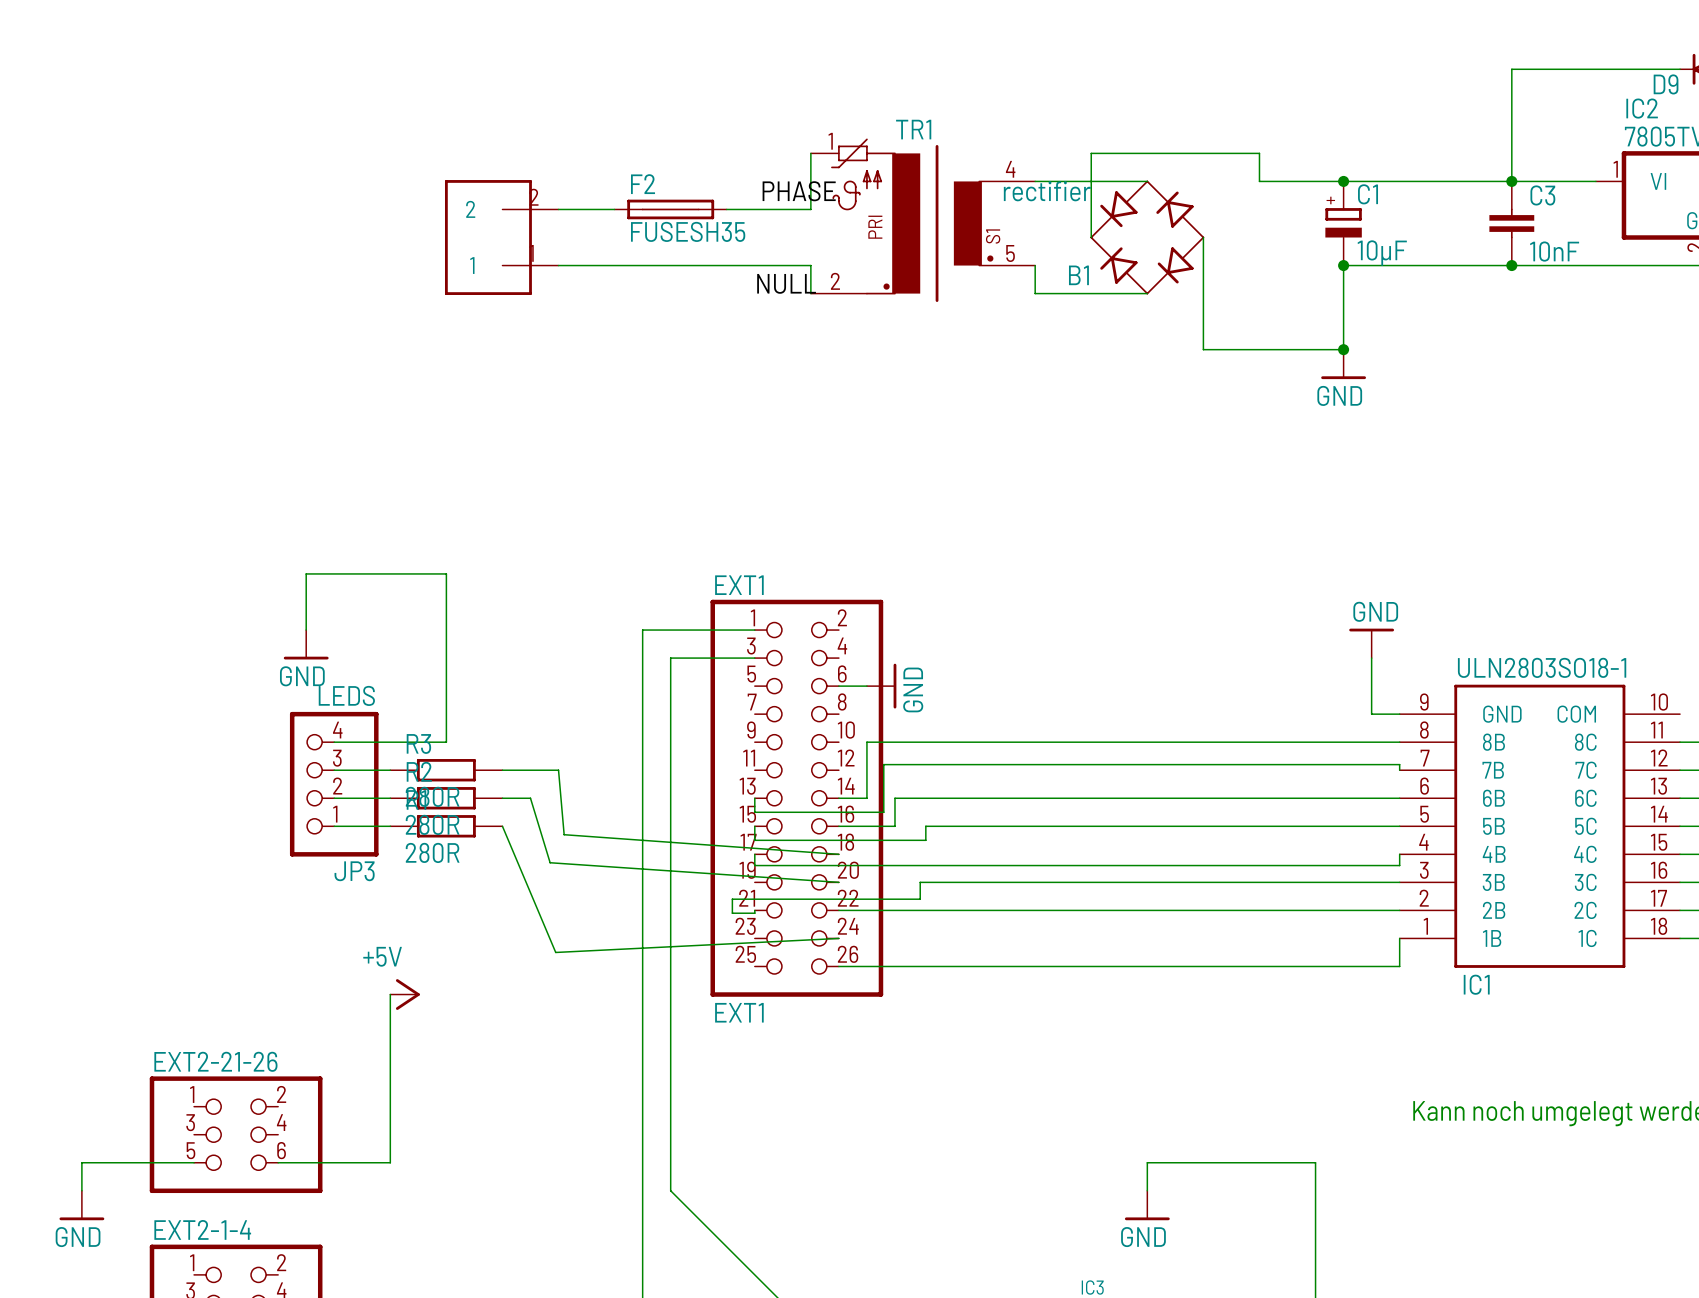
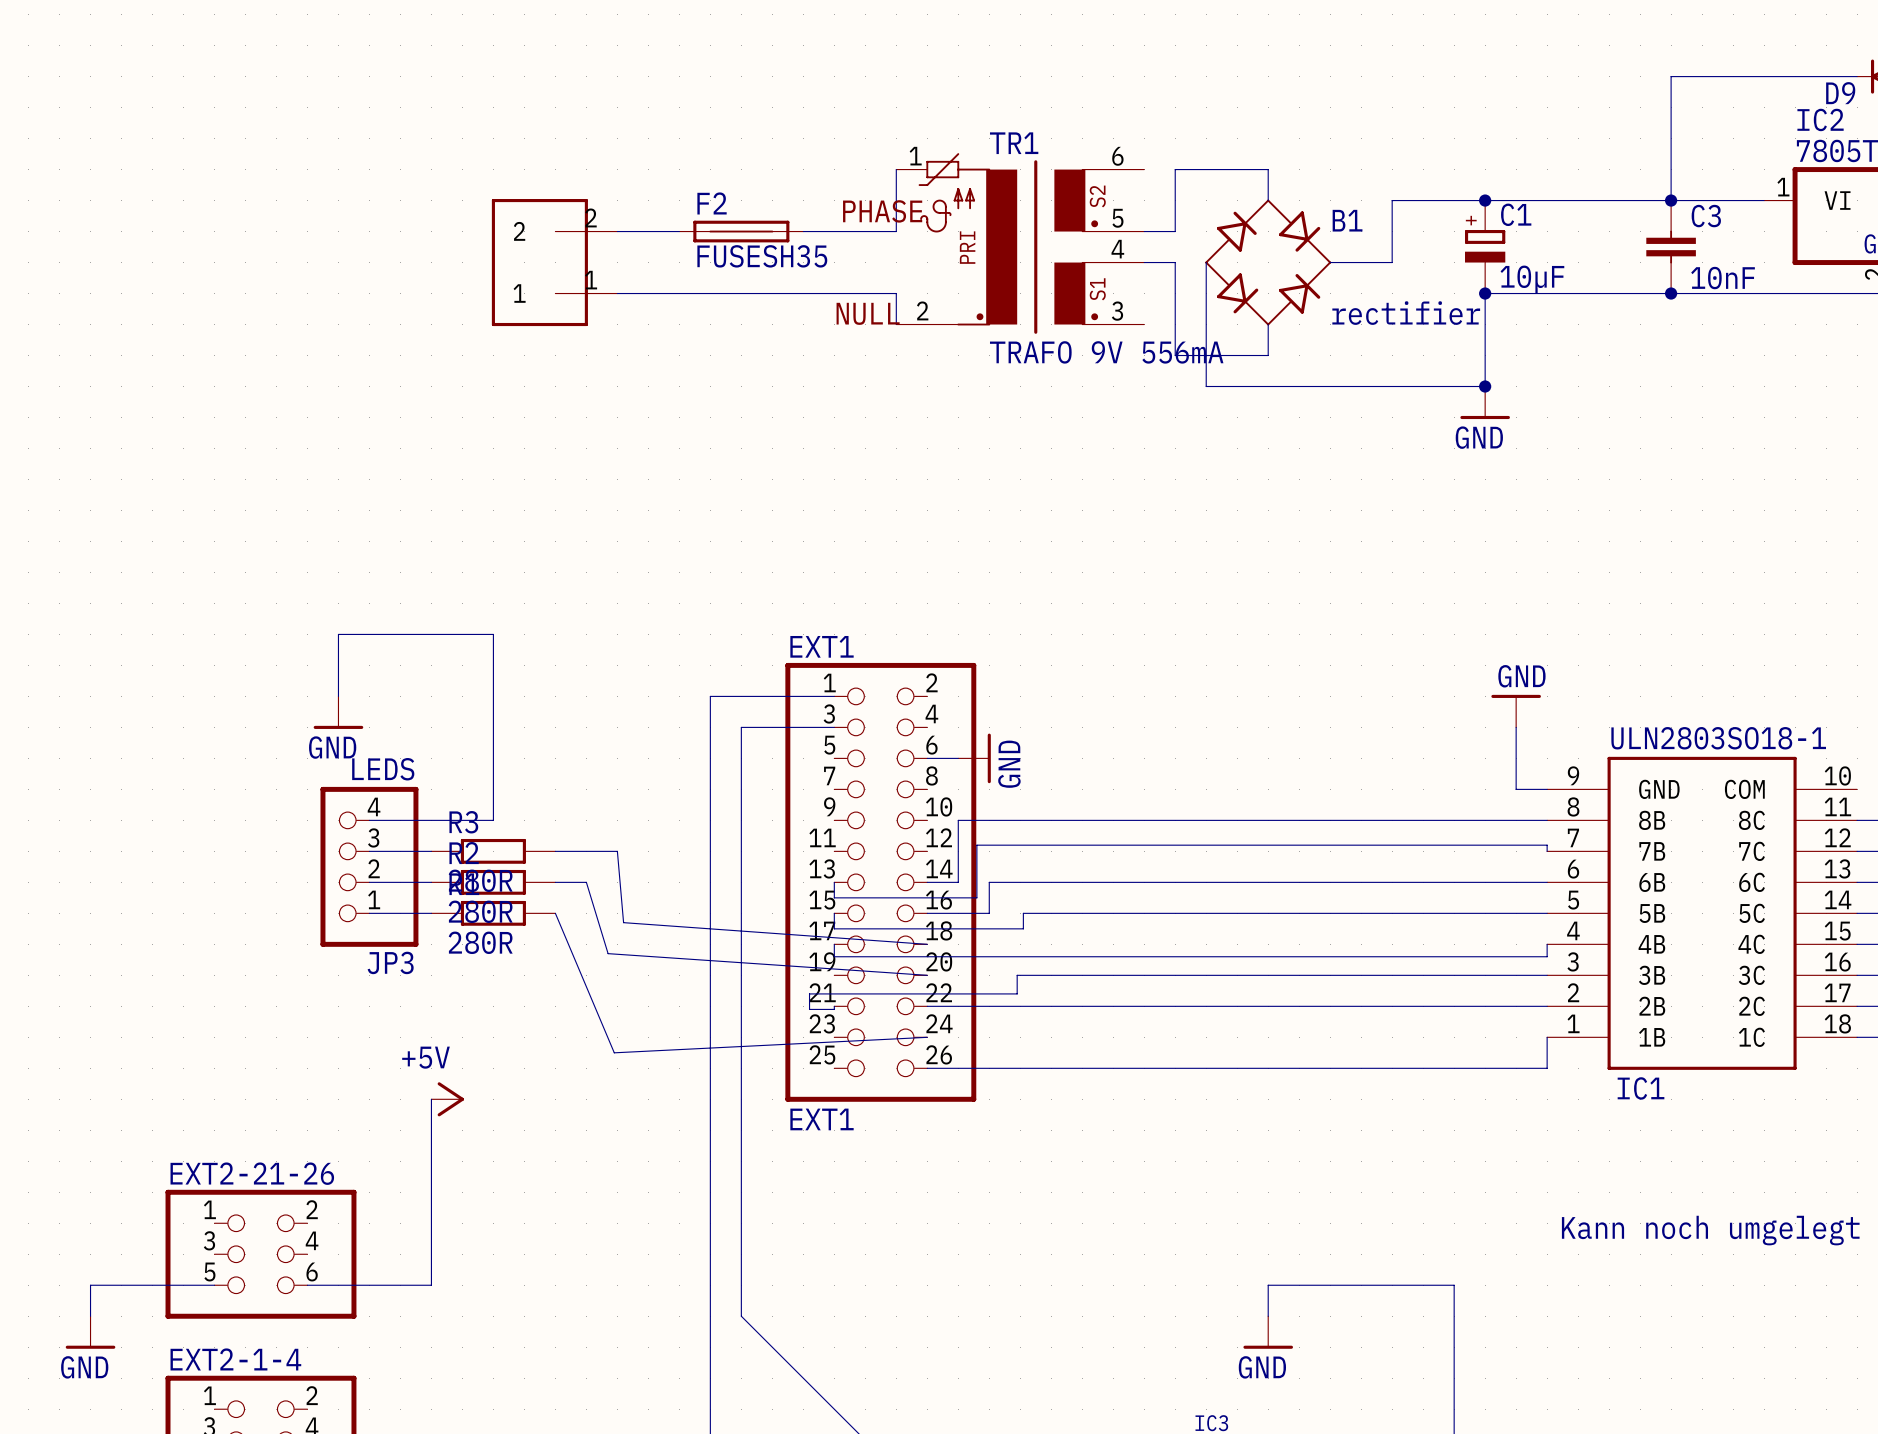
TR1 symbol: [810, 138, 1036, 302] -> [896, 153, 1145, 334]
wire: (1091, 153) (1091, 237) -> (1206, 169) (1175, 169) (1175, 231) (1144, 231)
wire: (1147, 153) (1259, 153) (1259, 181) -> (1330, 262) (1392, 262) (1392, 200)
wire: (1035, 181) (1147, 181) -> (1268, 169) (1268, 200)
B1 rotation: 0° (1147, 237) -> 180° (1268, 262)
wire: (1203, 237) (1203, 349) -> (1206, 262) (1206, 386) (1330, 386)
wire: (1035, 265) (1035, 293) (1147, 293) -> (1144, 262) (1175, 262) (1175, 355) (1268, 355) (1268, 324)
TR1 value: none -> TRAFO 9V 556mA (1106, 352)

